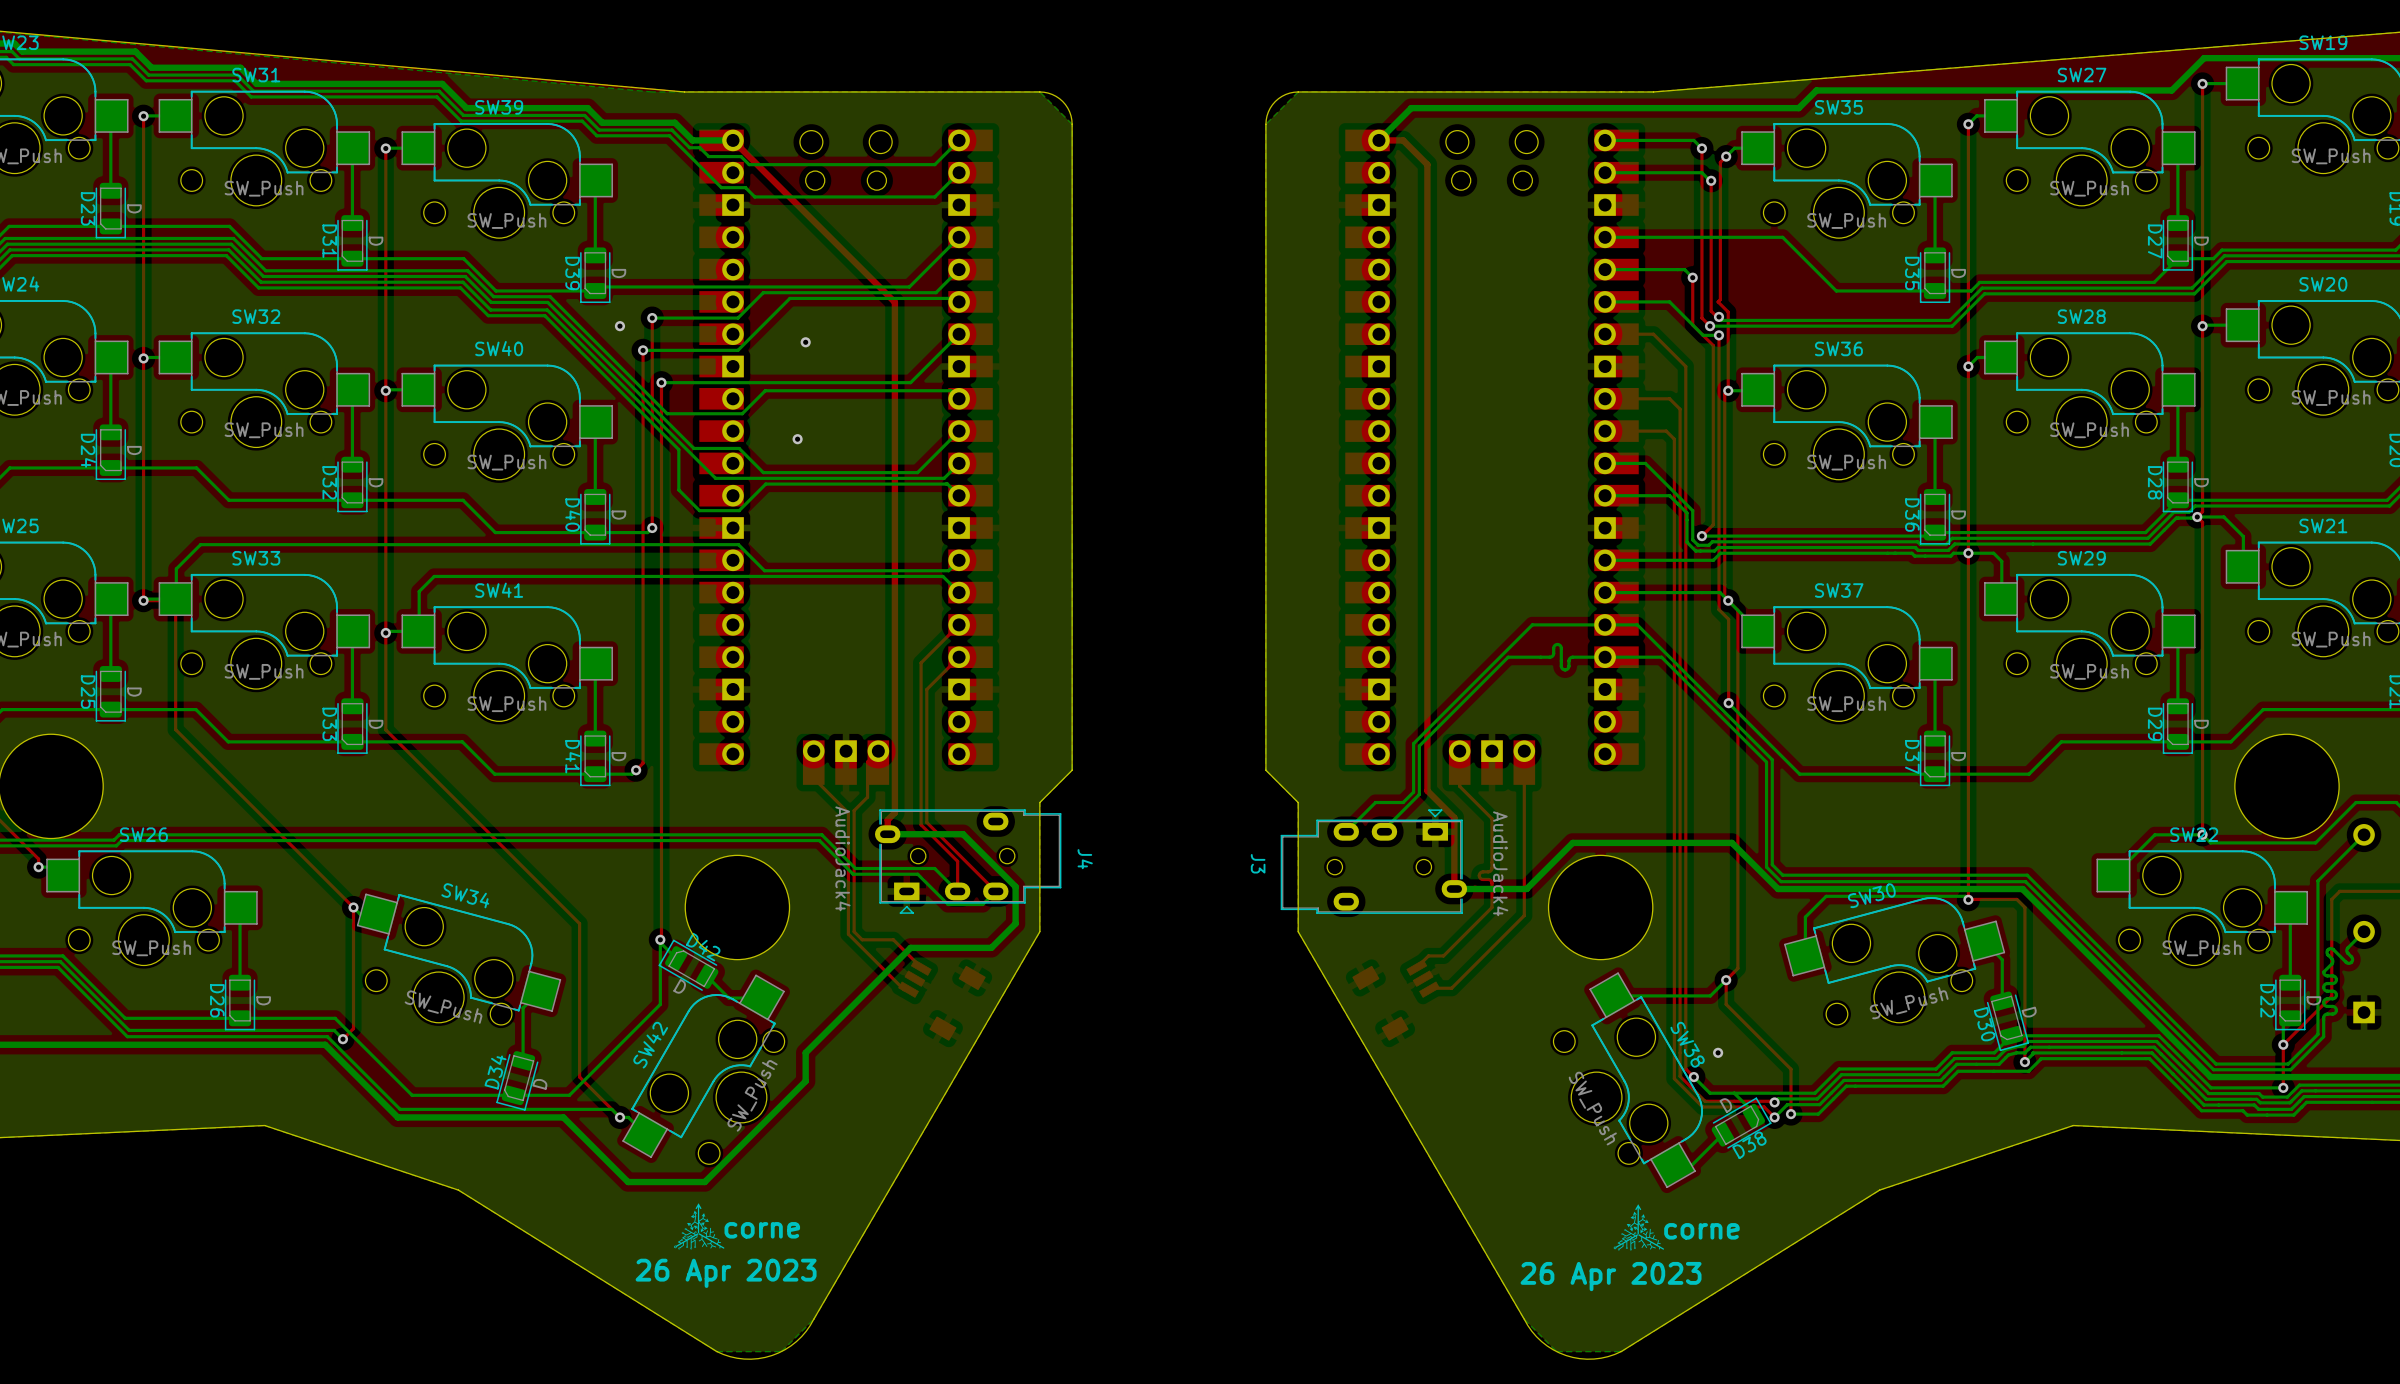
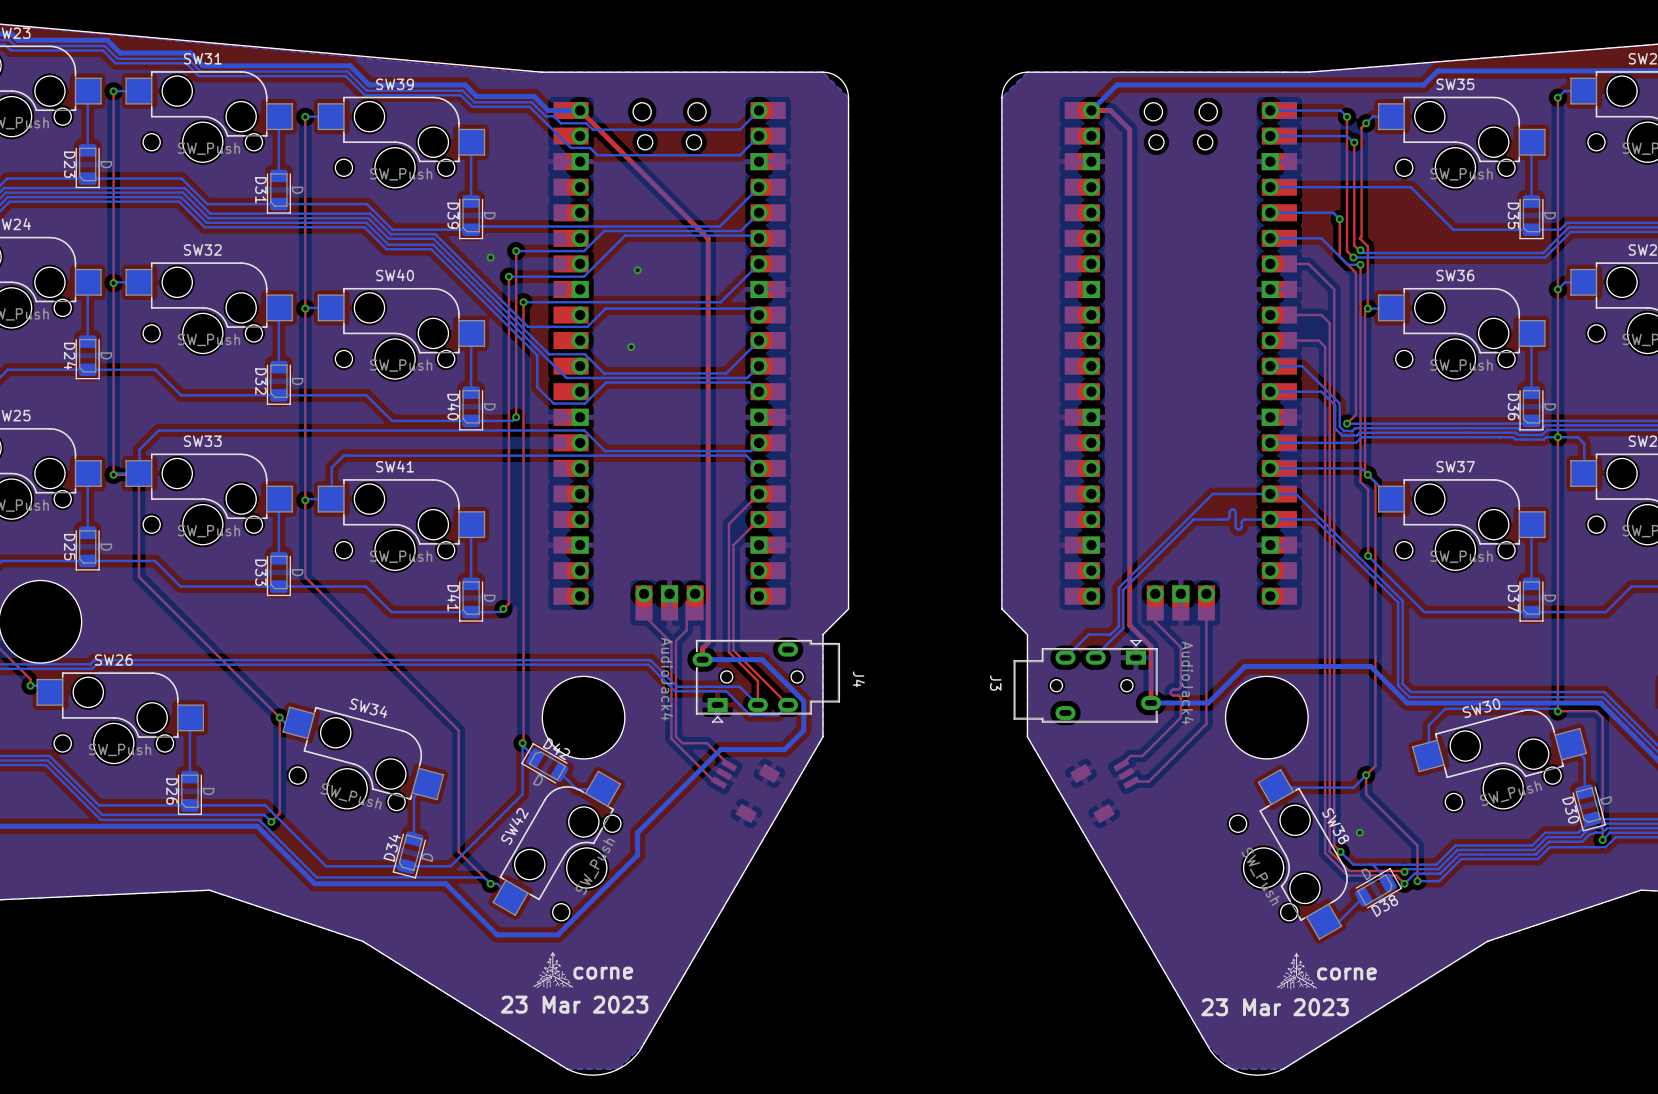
text: 26 Apr 2023 (726, 1273) -> 23 Mar 2023 (574, 1004)
text: 26 Apr 2023 (1611, 1276) -> 23 Mar 2023 (1275, 1007)

